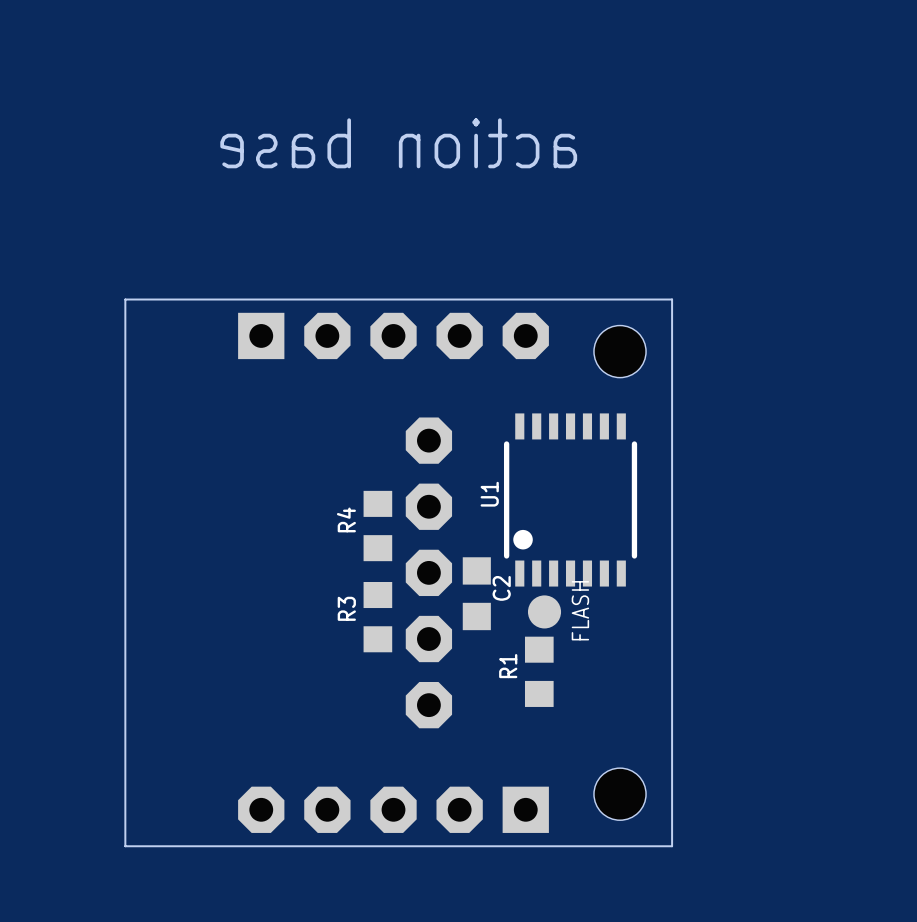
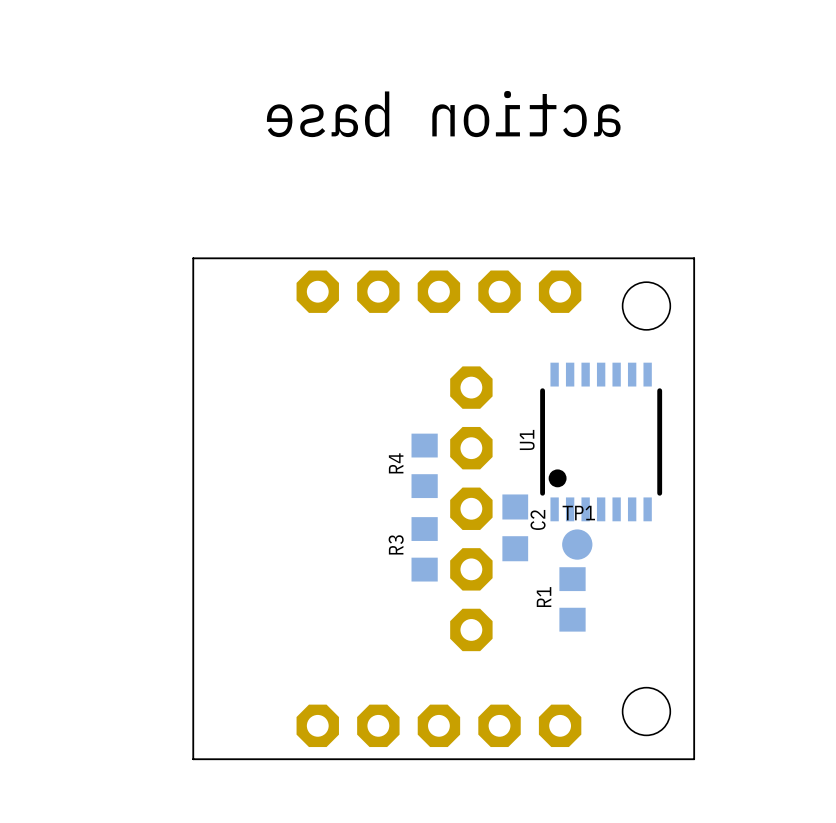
part footprint: [238, 312, 549, 360] -> [296, 270, 582, 313]
FLASH name: FLASH (580, 610) -> TP1 (578, 513)
part footprint: [238, 786, 549, 833] -> [296, 704, 582, 748]

